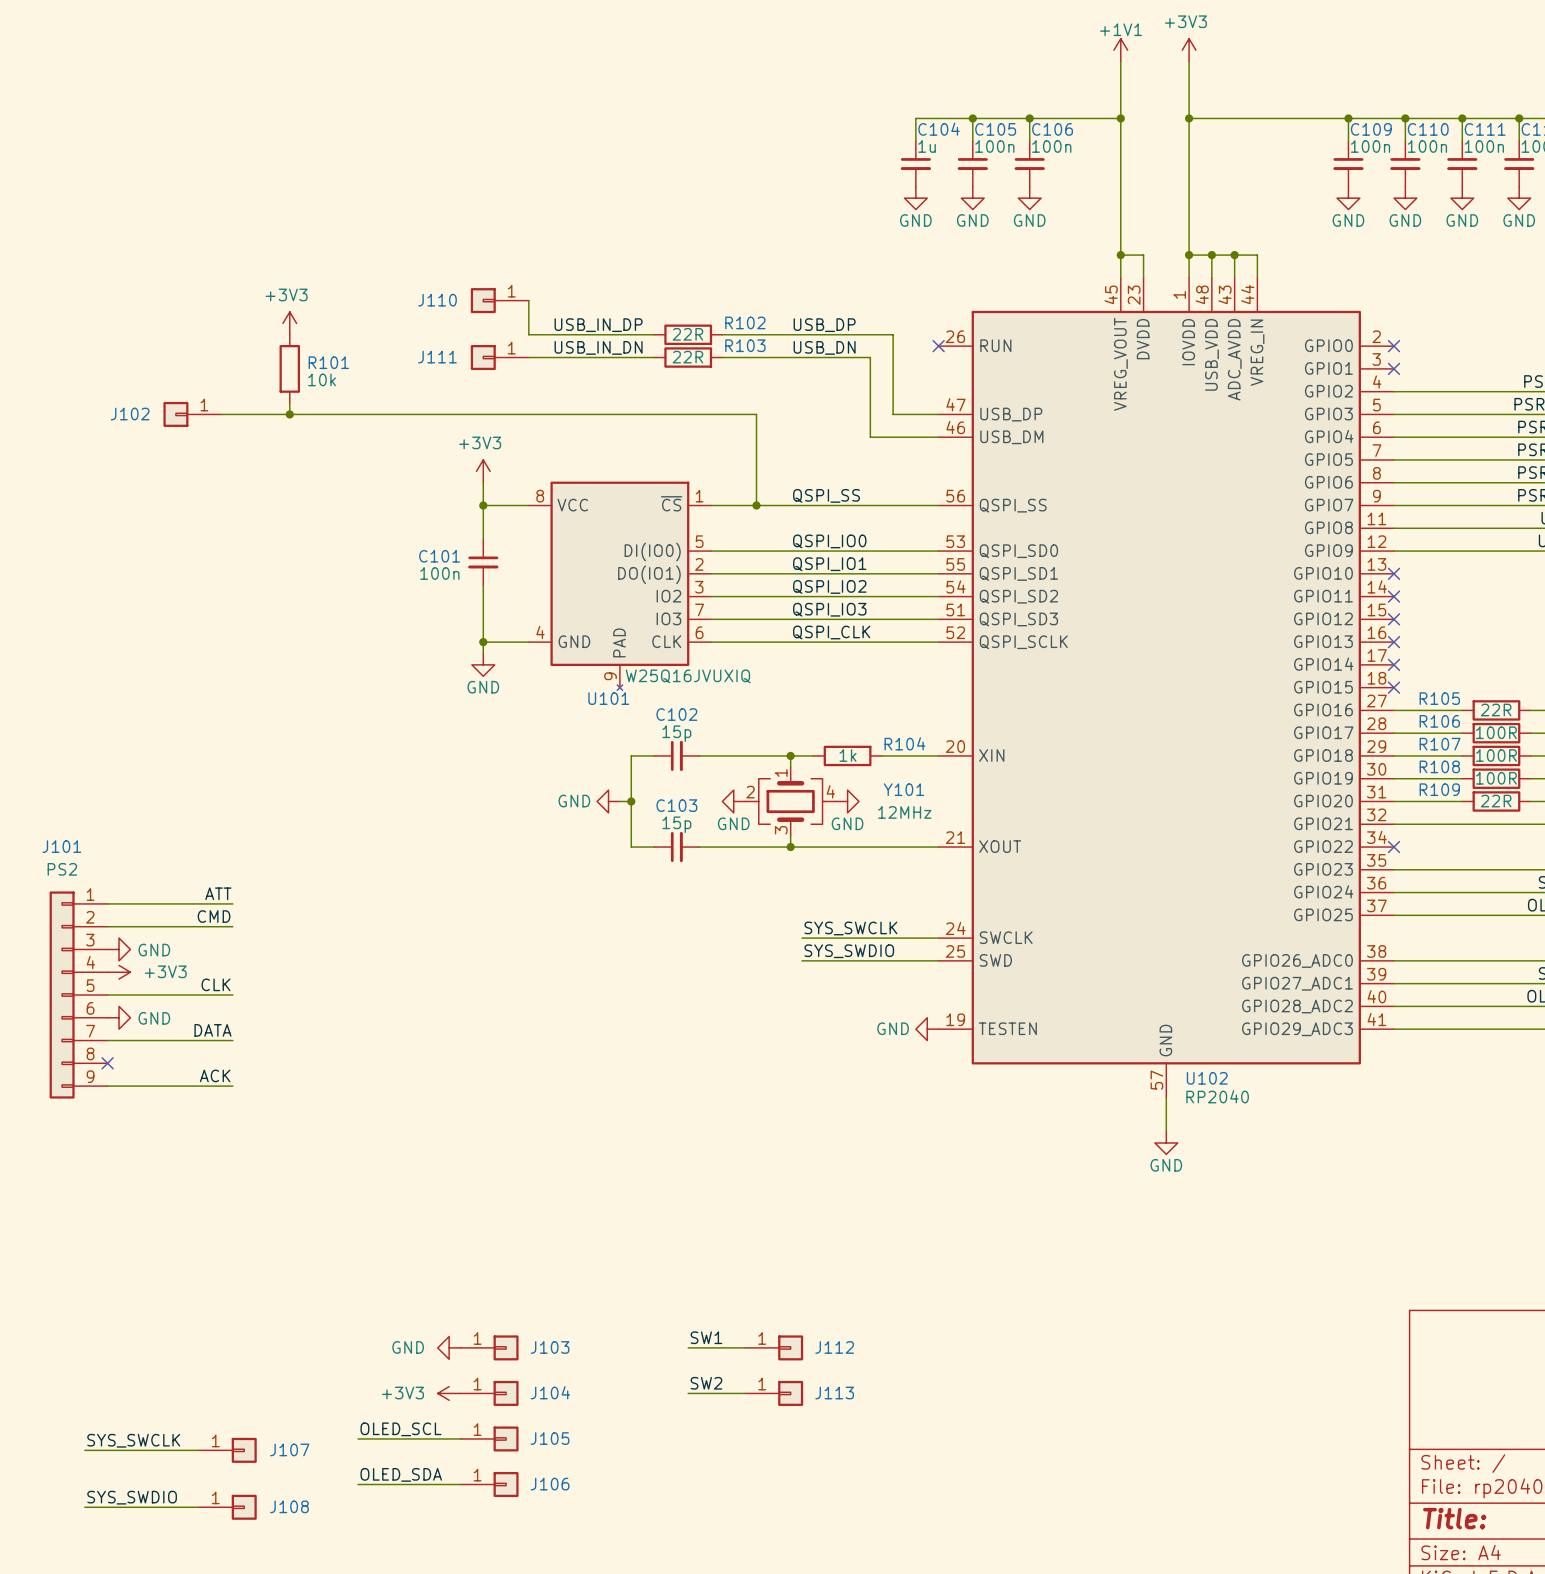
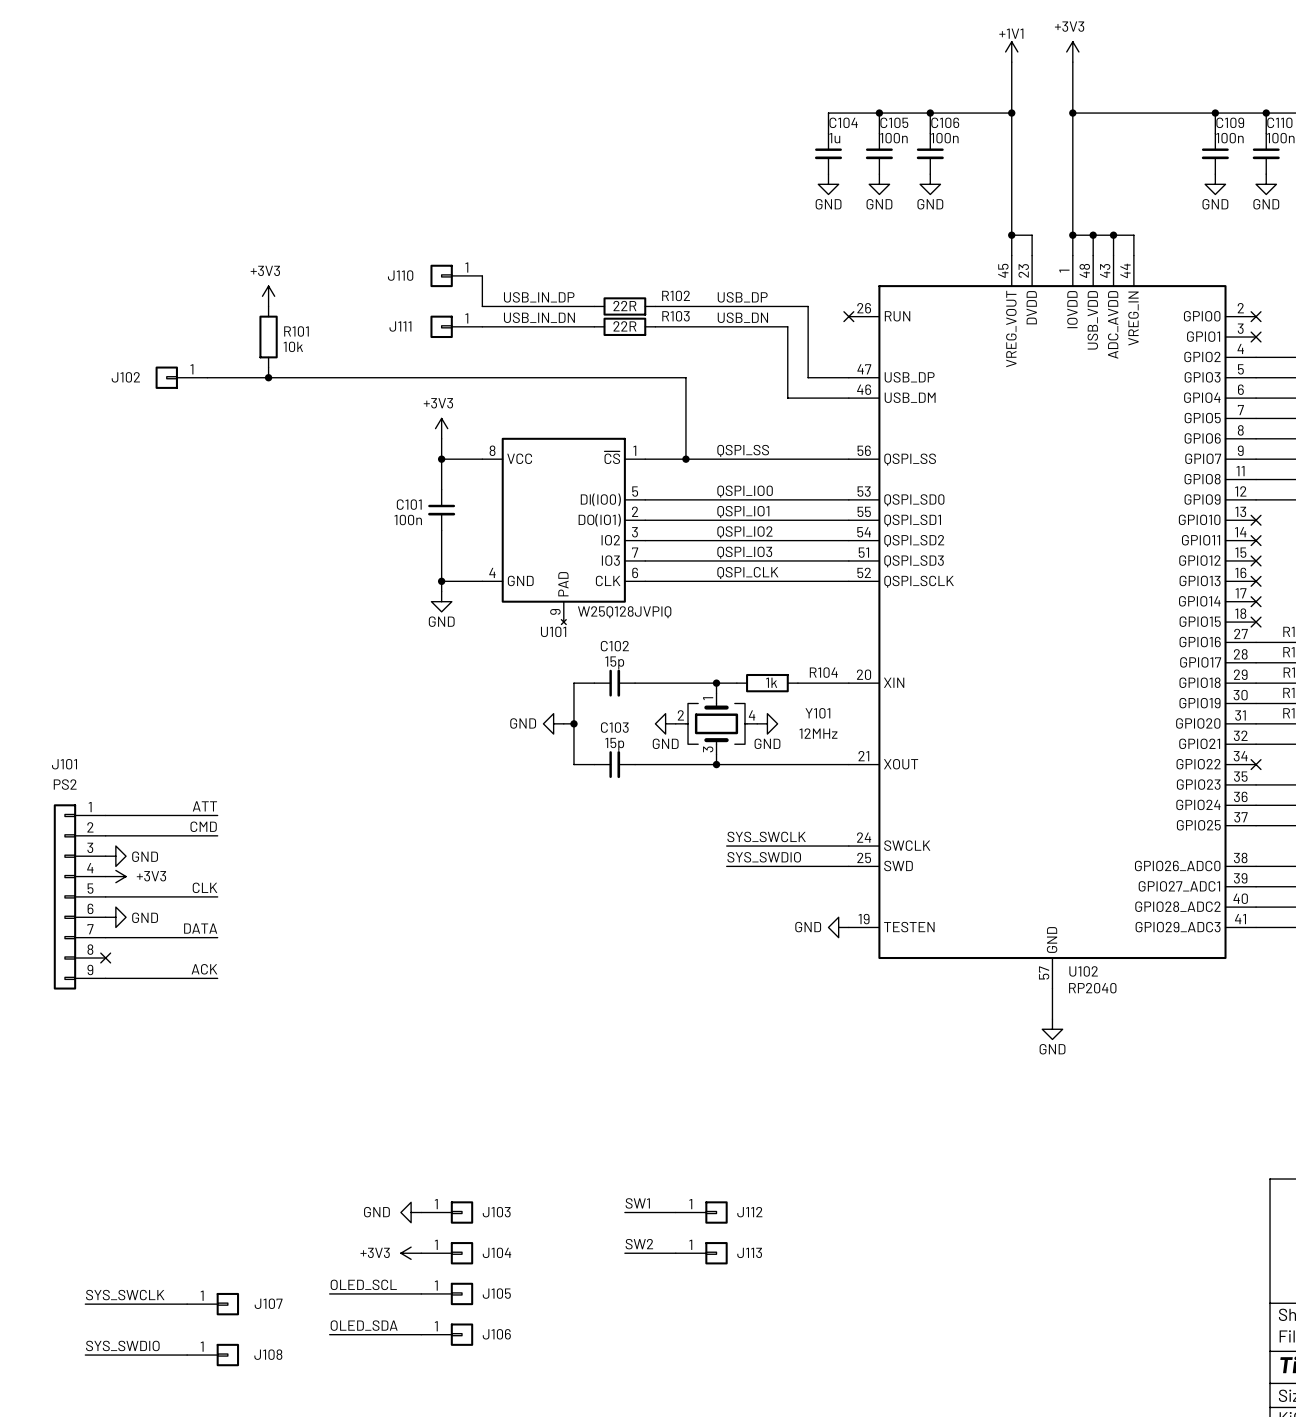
U101 value: W25Q16JVUXIQ (688, 676) -> W25Q128JVPIQ (624, 612)

